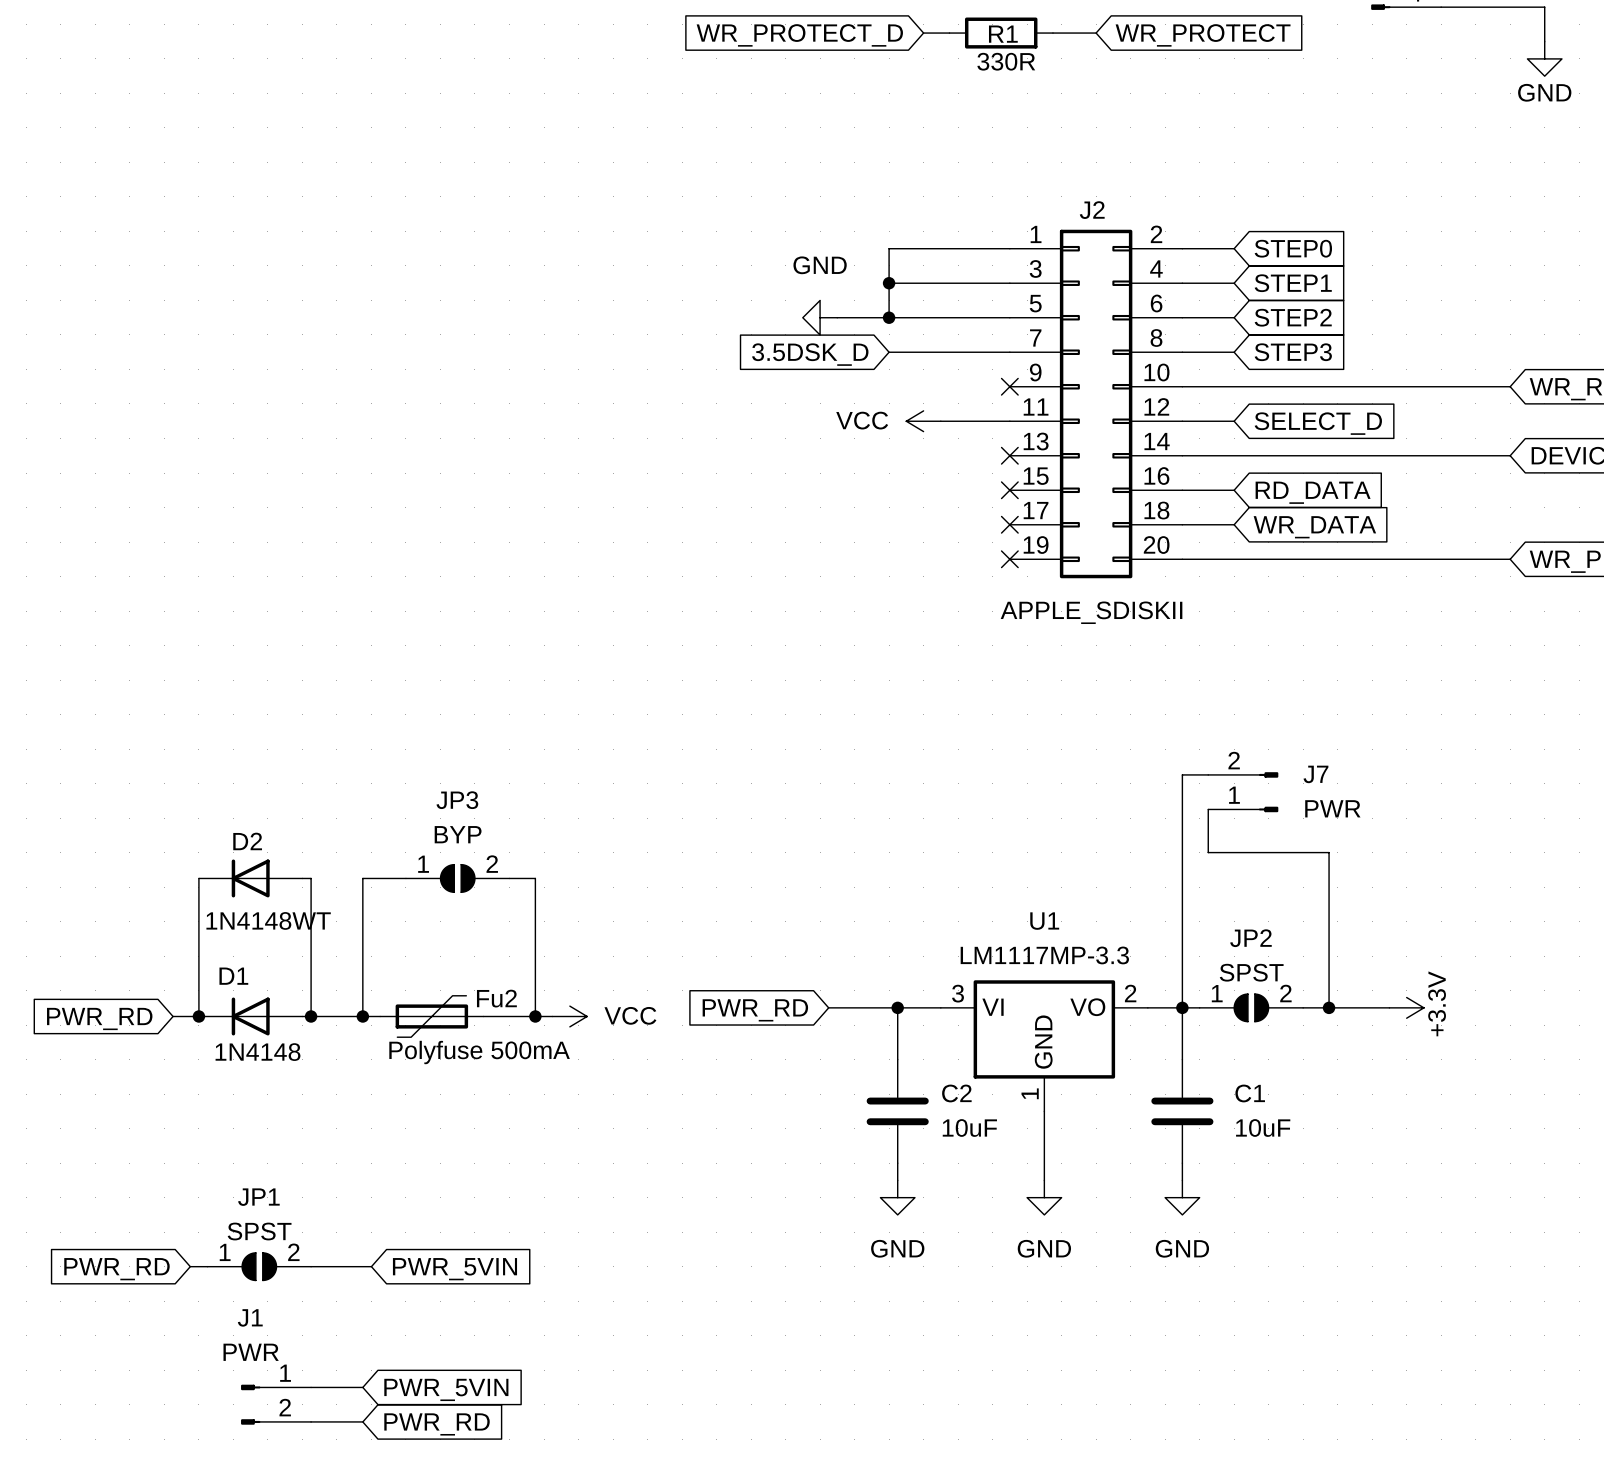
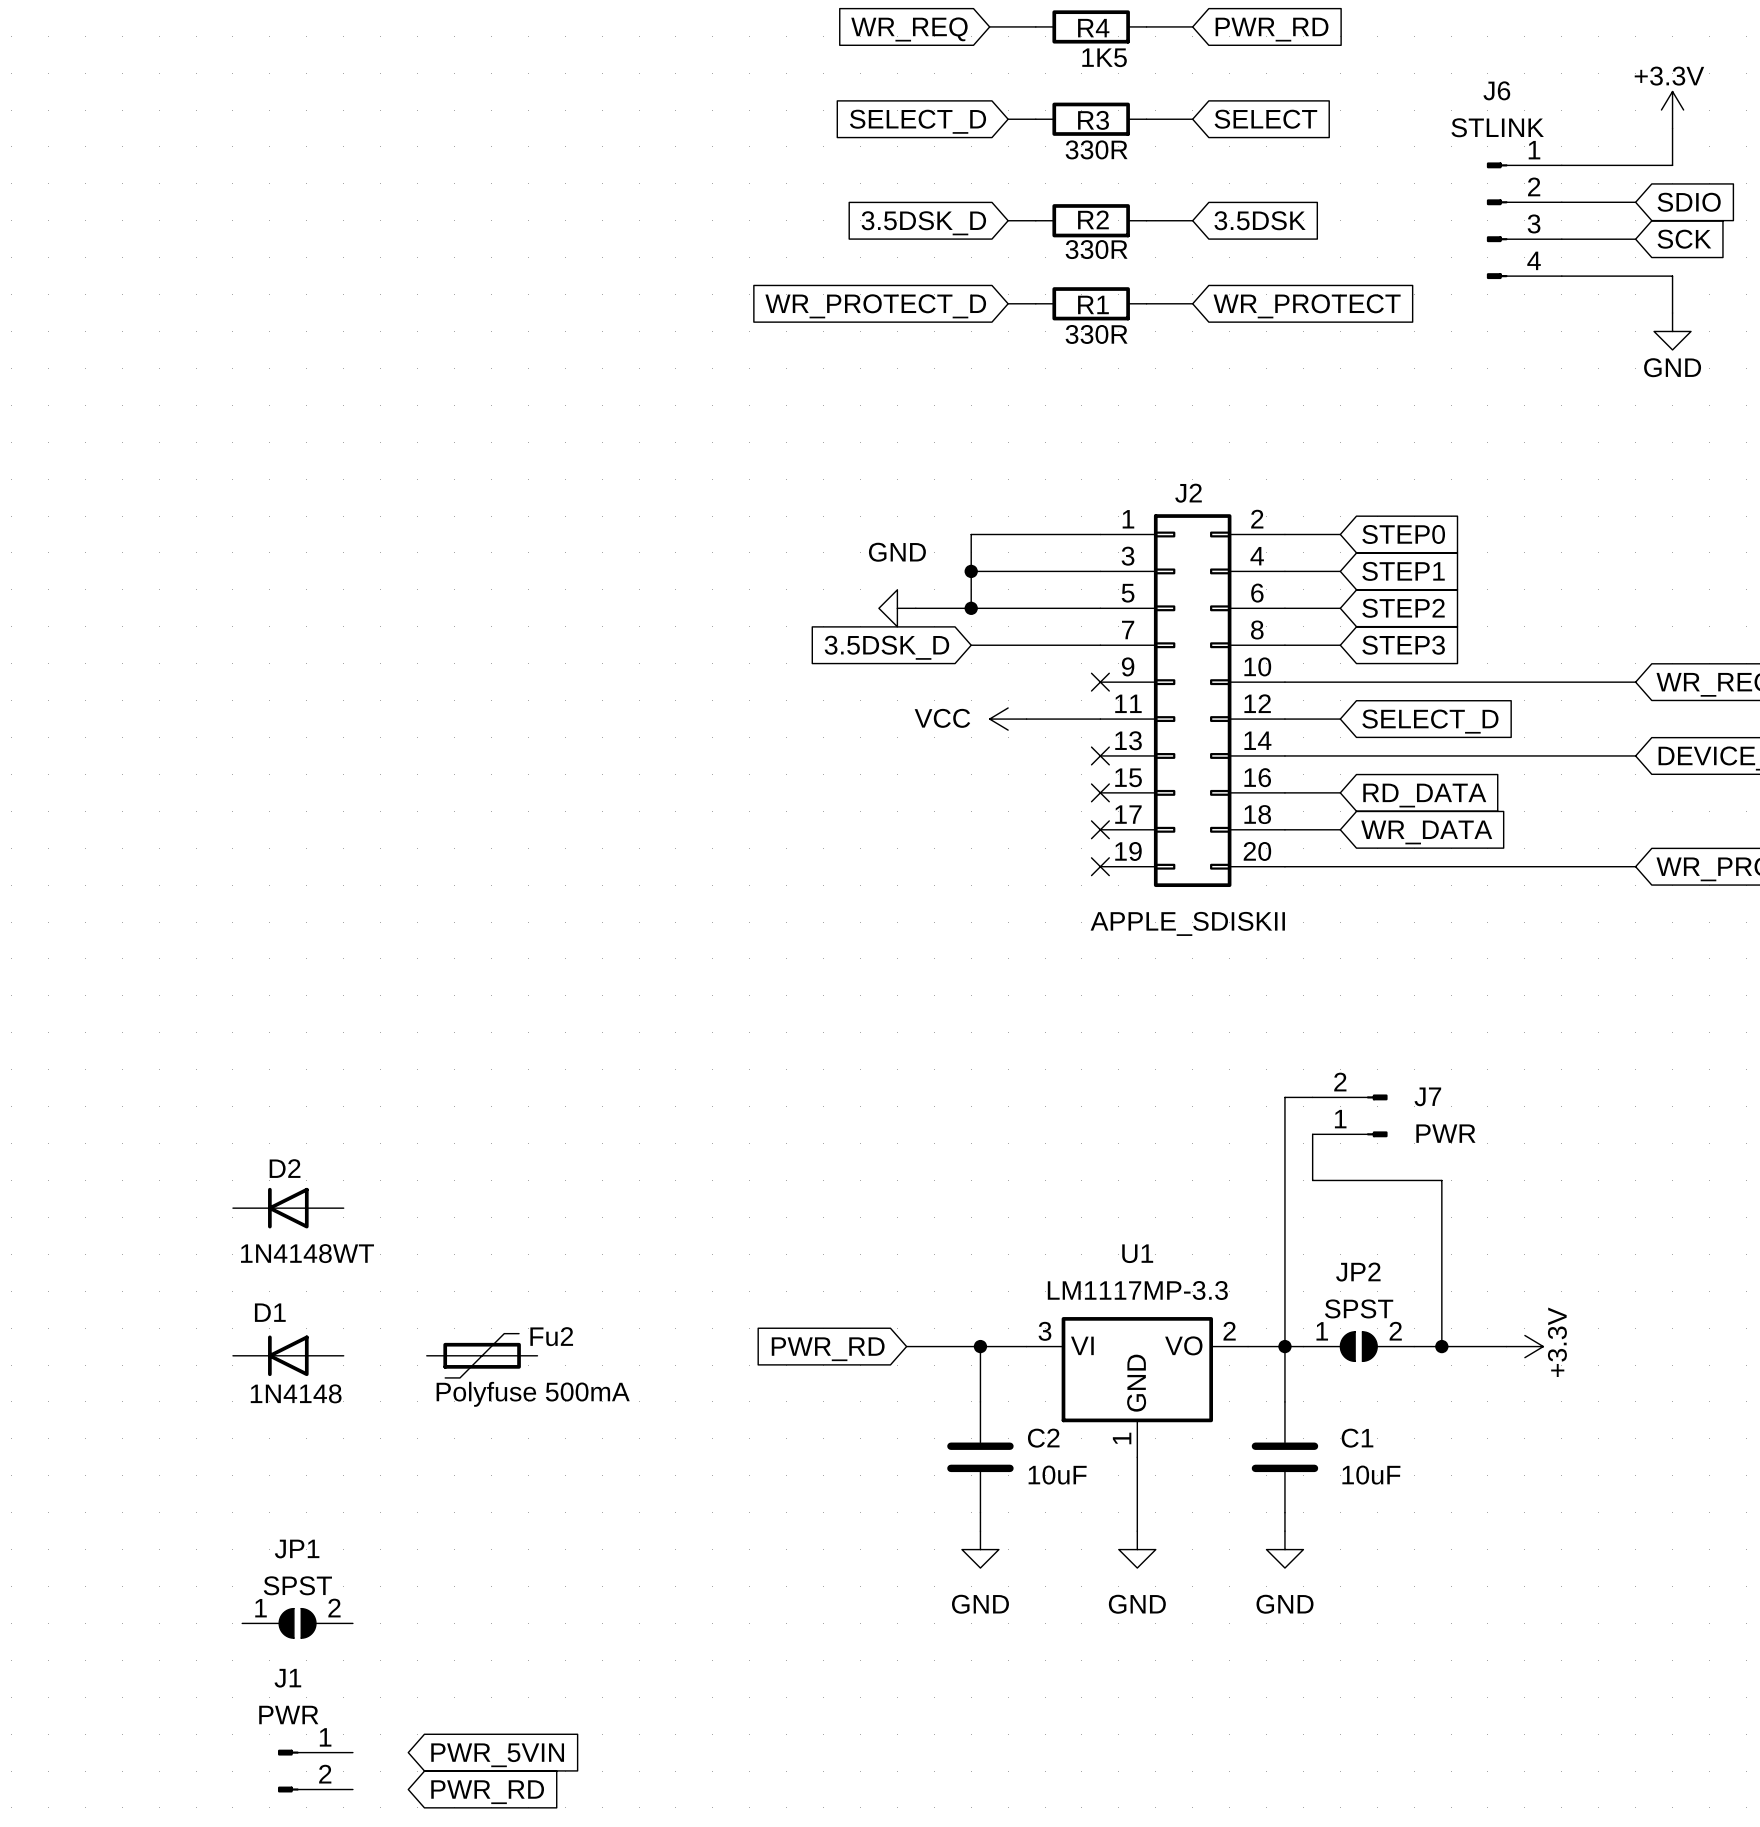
wire: (198, 878) (198, 1016) (173, 1016) -> none
wire: (302, 878) (311, 878) (311, 1016) -> none
wire: (405, 878) (362, 878) (362, 1016) -> none
JP3: BYP (457, 878) -> none
wire: (509, 878) (535, 878) (535, 1016) -> none
junction: (198, 1016) -> none
wire: (302, 1016) (380, 1016) -> none
junction: (311, 1016) -> none
junction: (362, 1016) -> none
wire: (483, 1016) (552, 1016) -> none
junction: (535, 1016) -> none
power symbol: VCC (569, 1016) -> none
global label: PWR_RD (99, 1018) -> none
wire: (190, 1266) (207, 1266) -> none
wire: (311, 1266) (371, 1266) -> none
global label: PWR_RD (116, 1269) -> none
global label: PWR_5VIN (454, 1269) -> none
wire: (311, 1387) (362, 1387) -> none
wire: (311, 1421) (362, 1421) -> none

